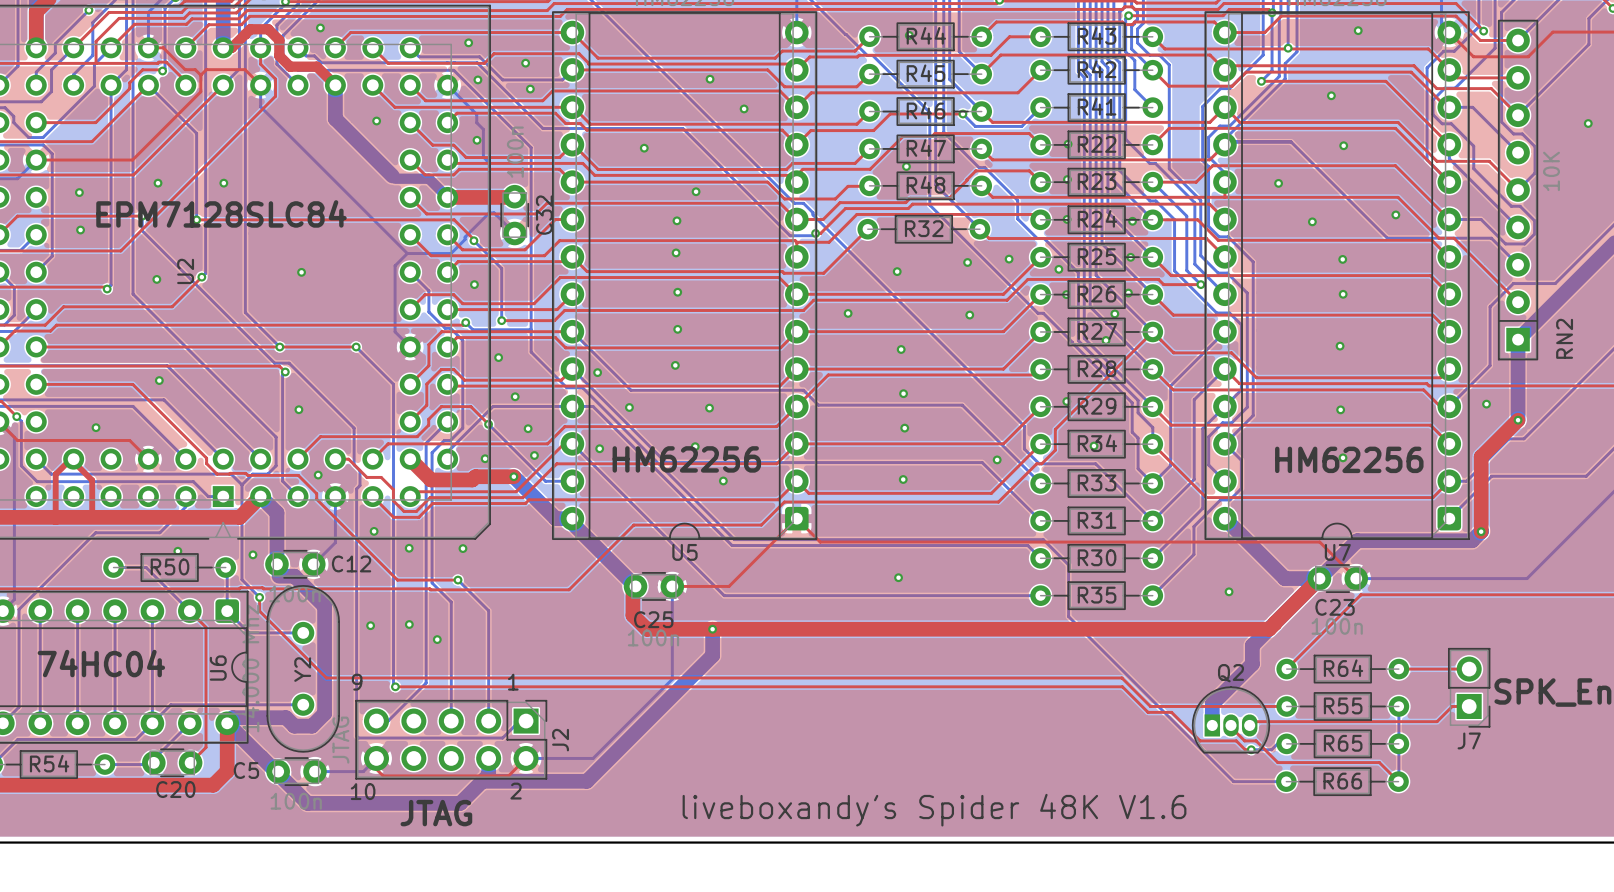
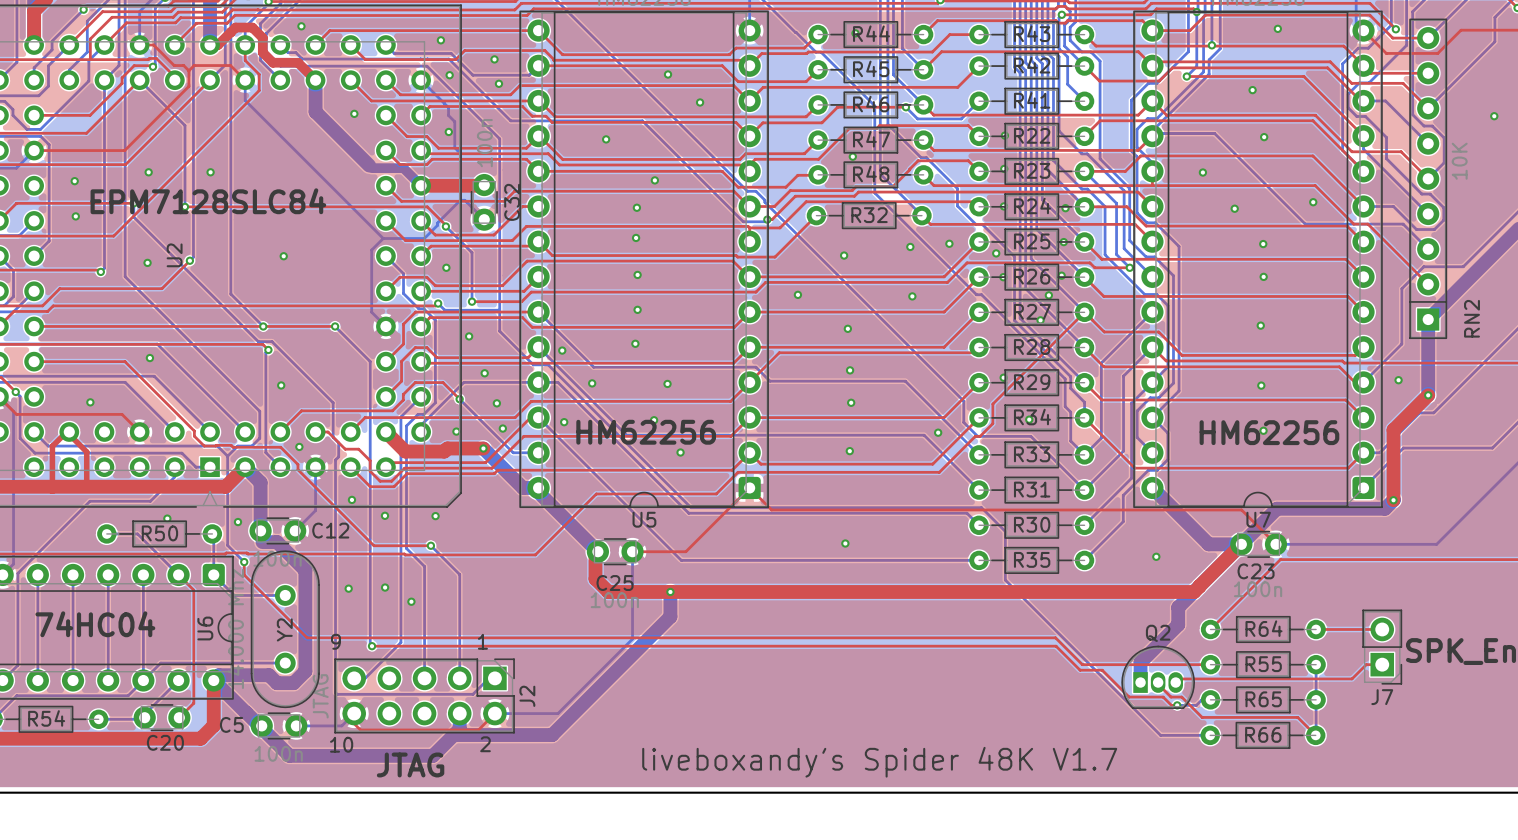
text: liveboxandy's Spider 48K V1.6 (934, 810) -> liveboxandy's Spider 48K V1.7 (879, 762)

